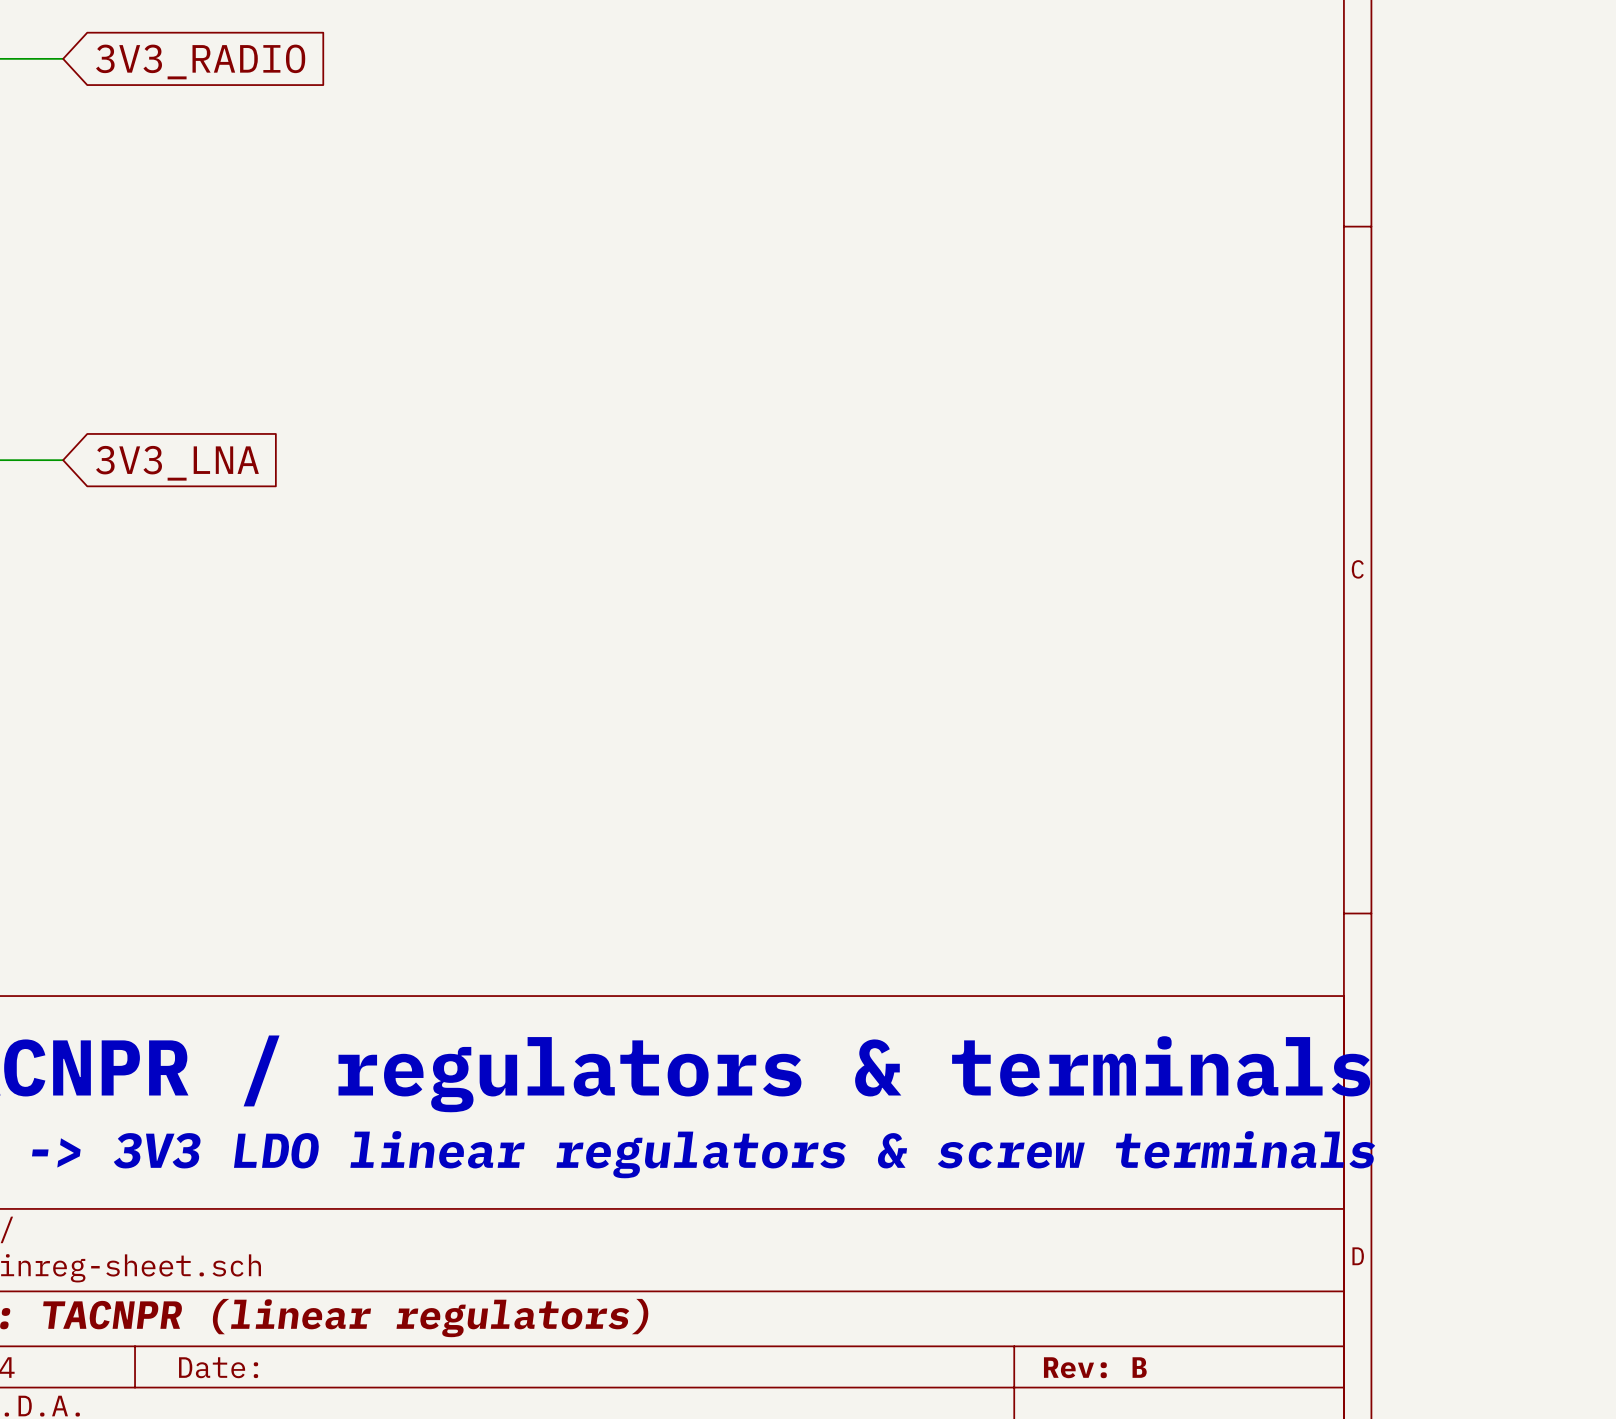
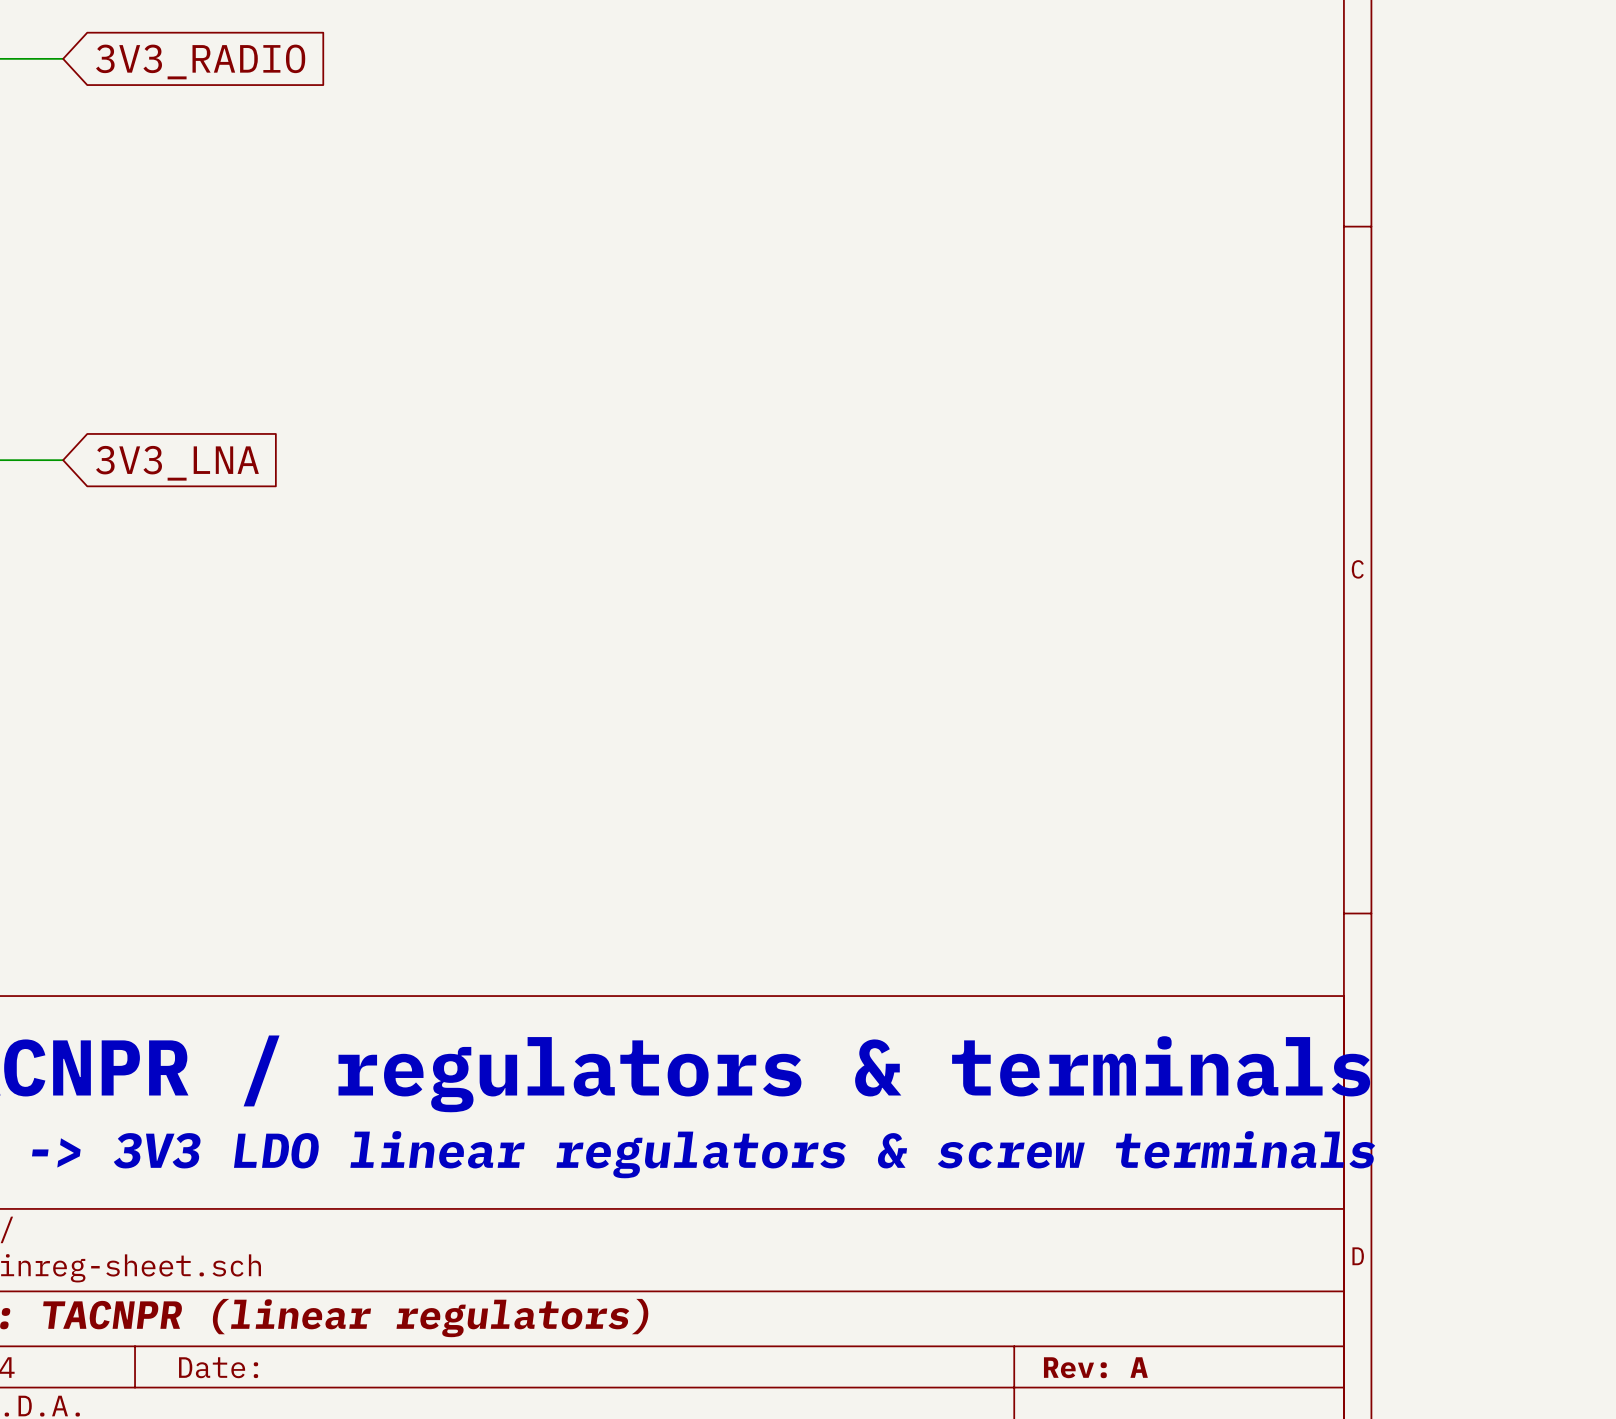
title block: Rev: B (1095, 1367) -> Rev: A (1095, 1367)

